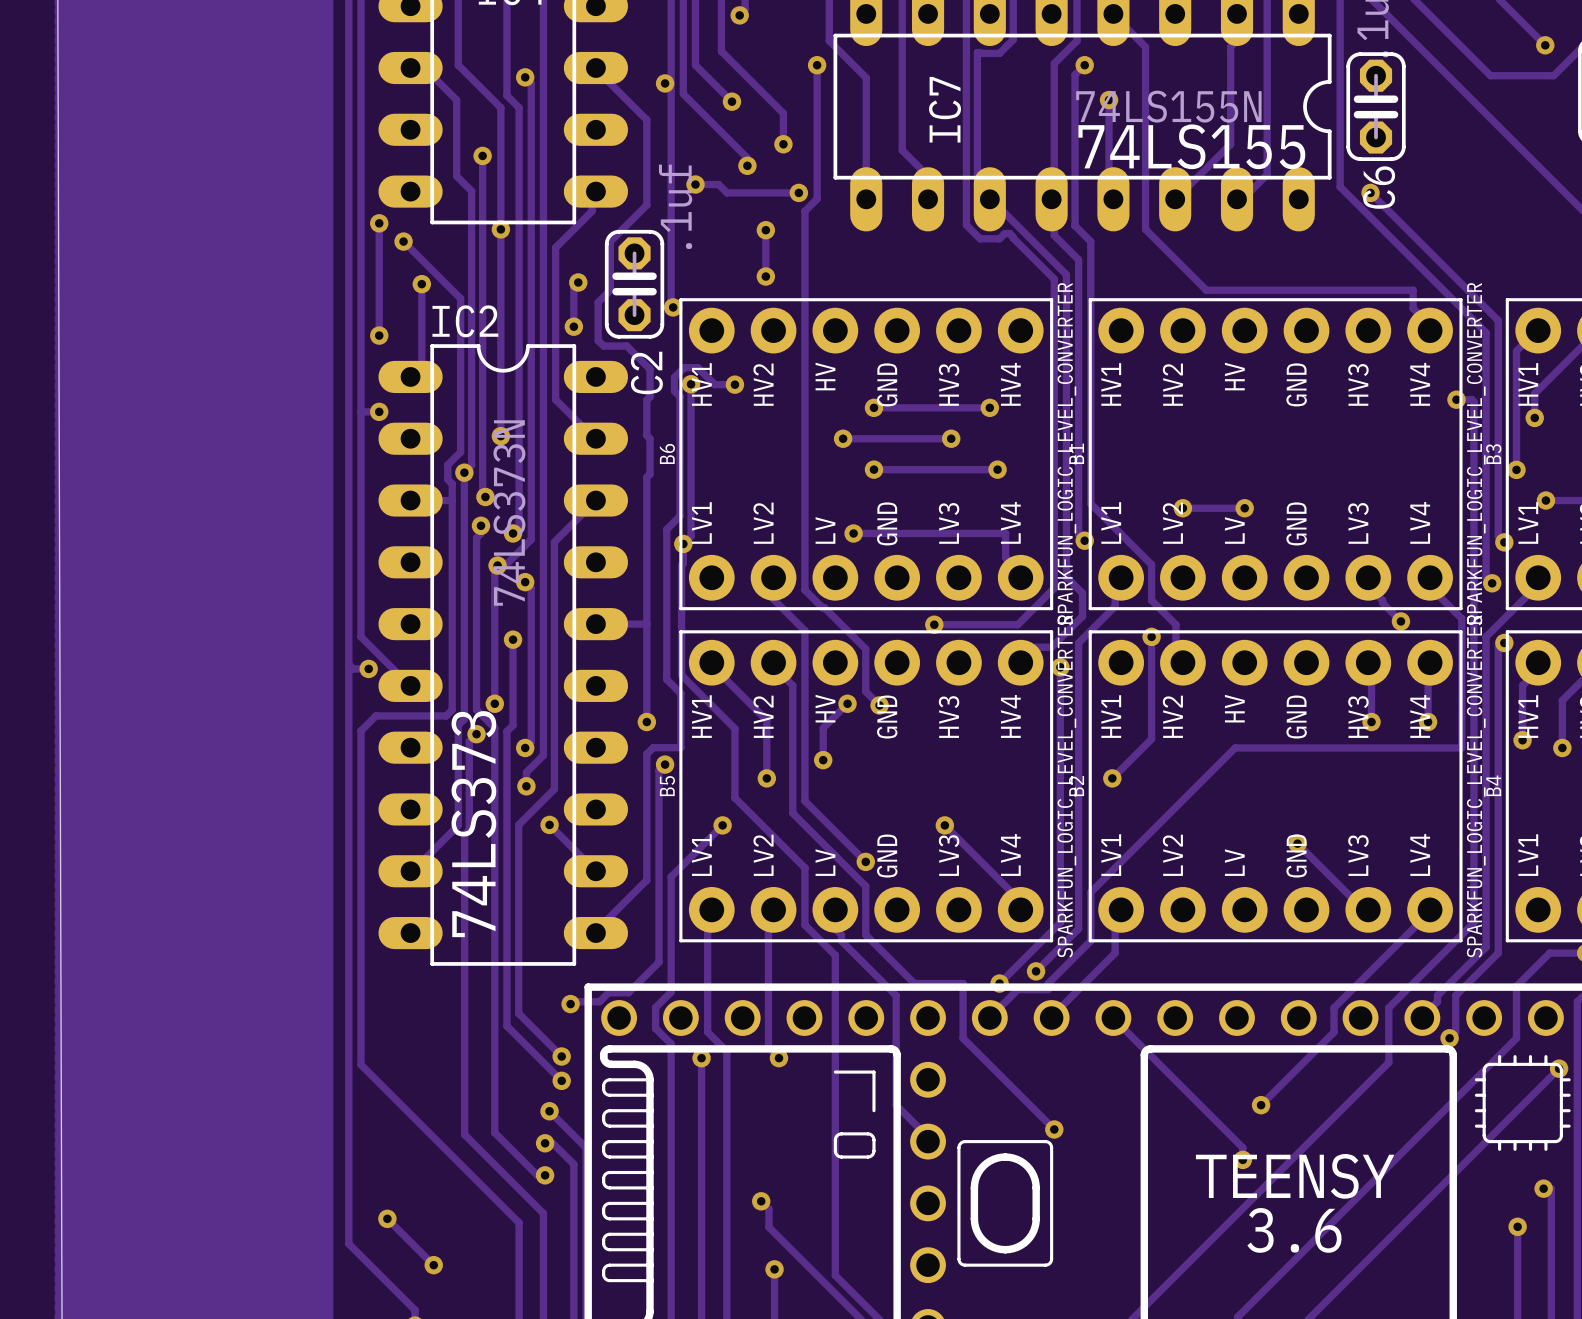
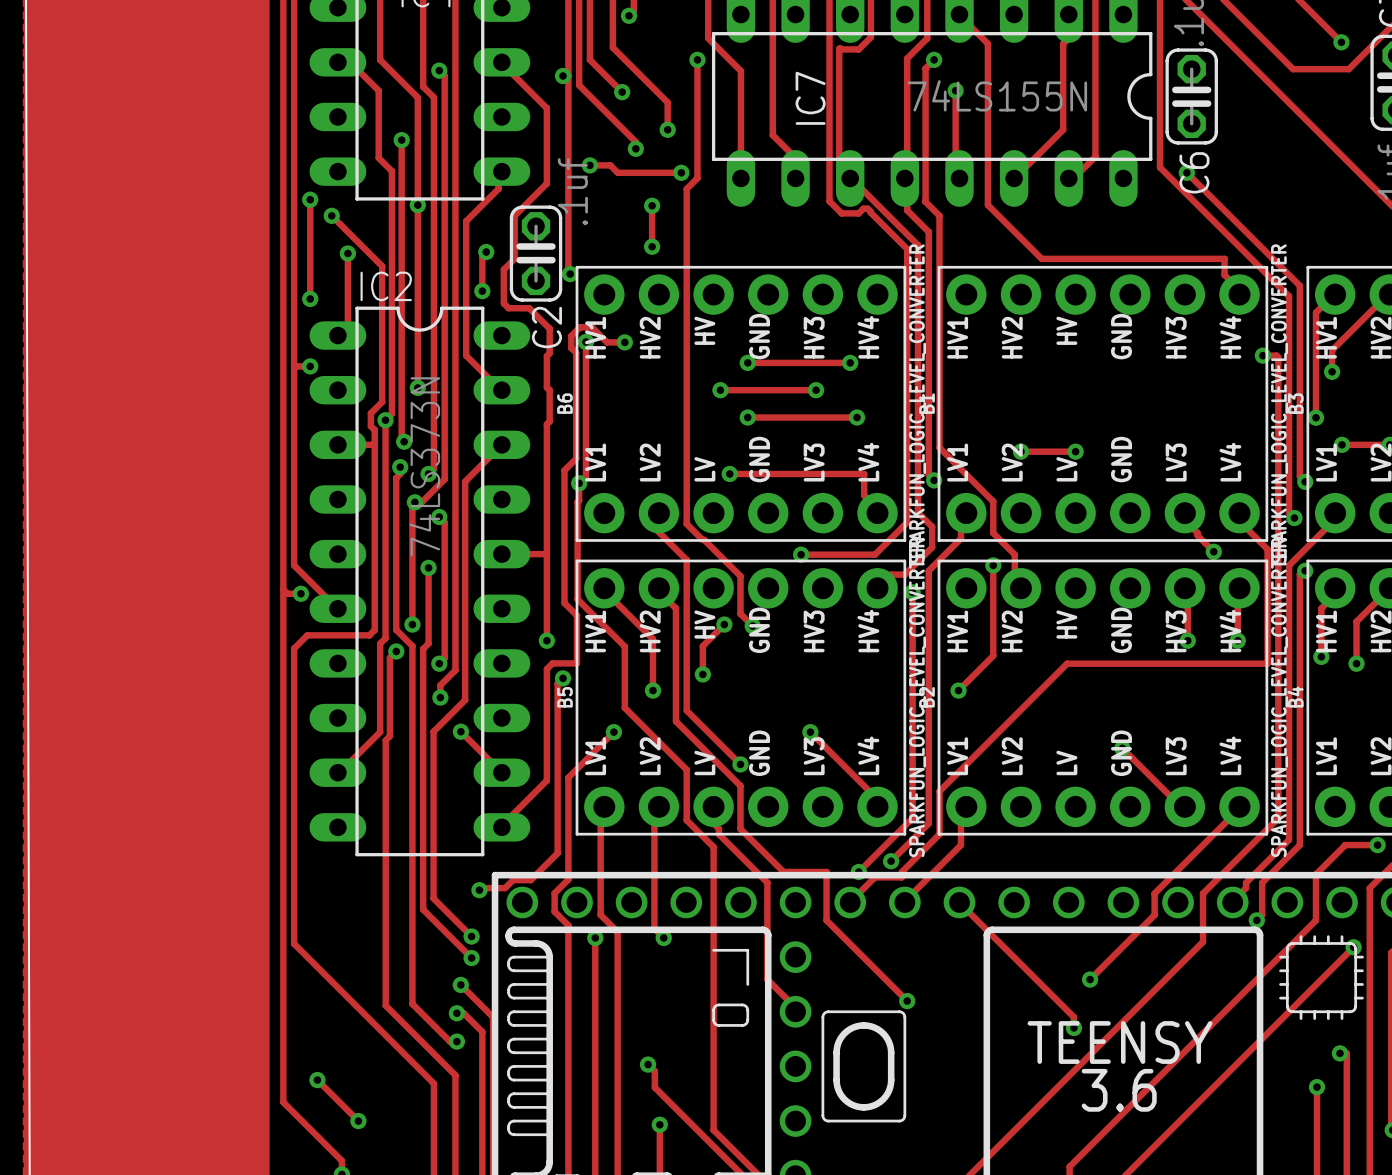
text: 74LS155 (1191, 146) -> none
text: 74LS373 (473, 824) -> none

